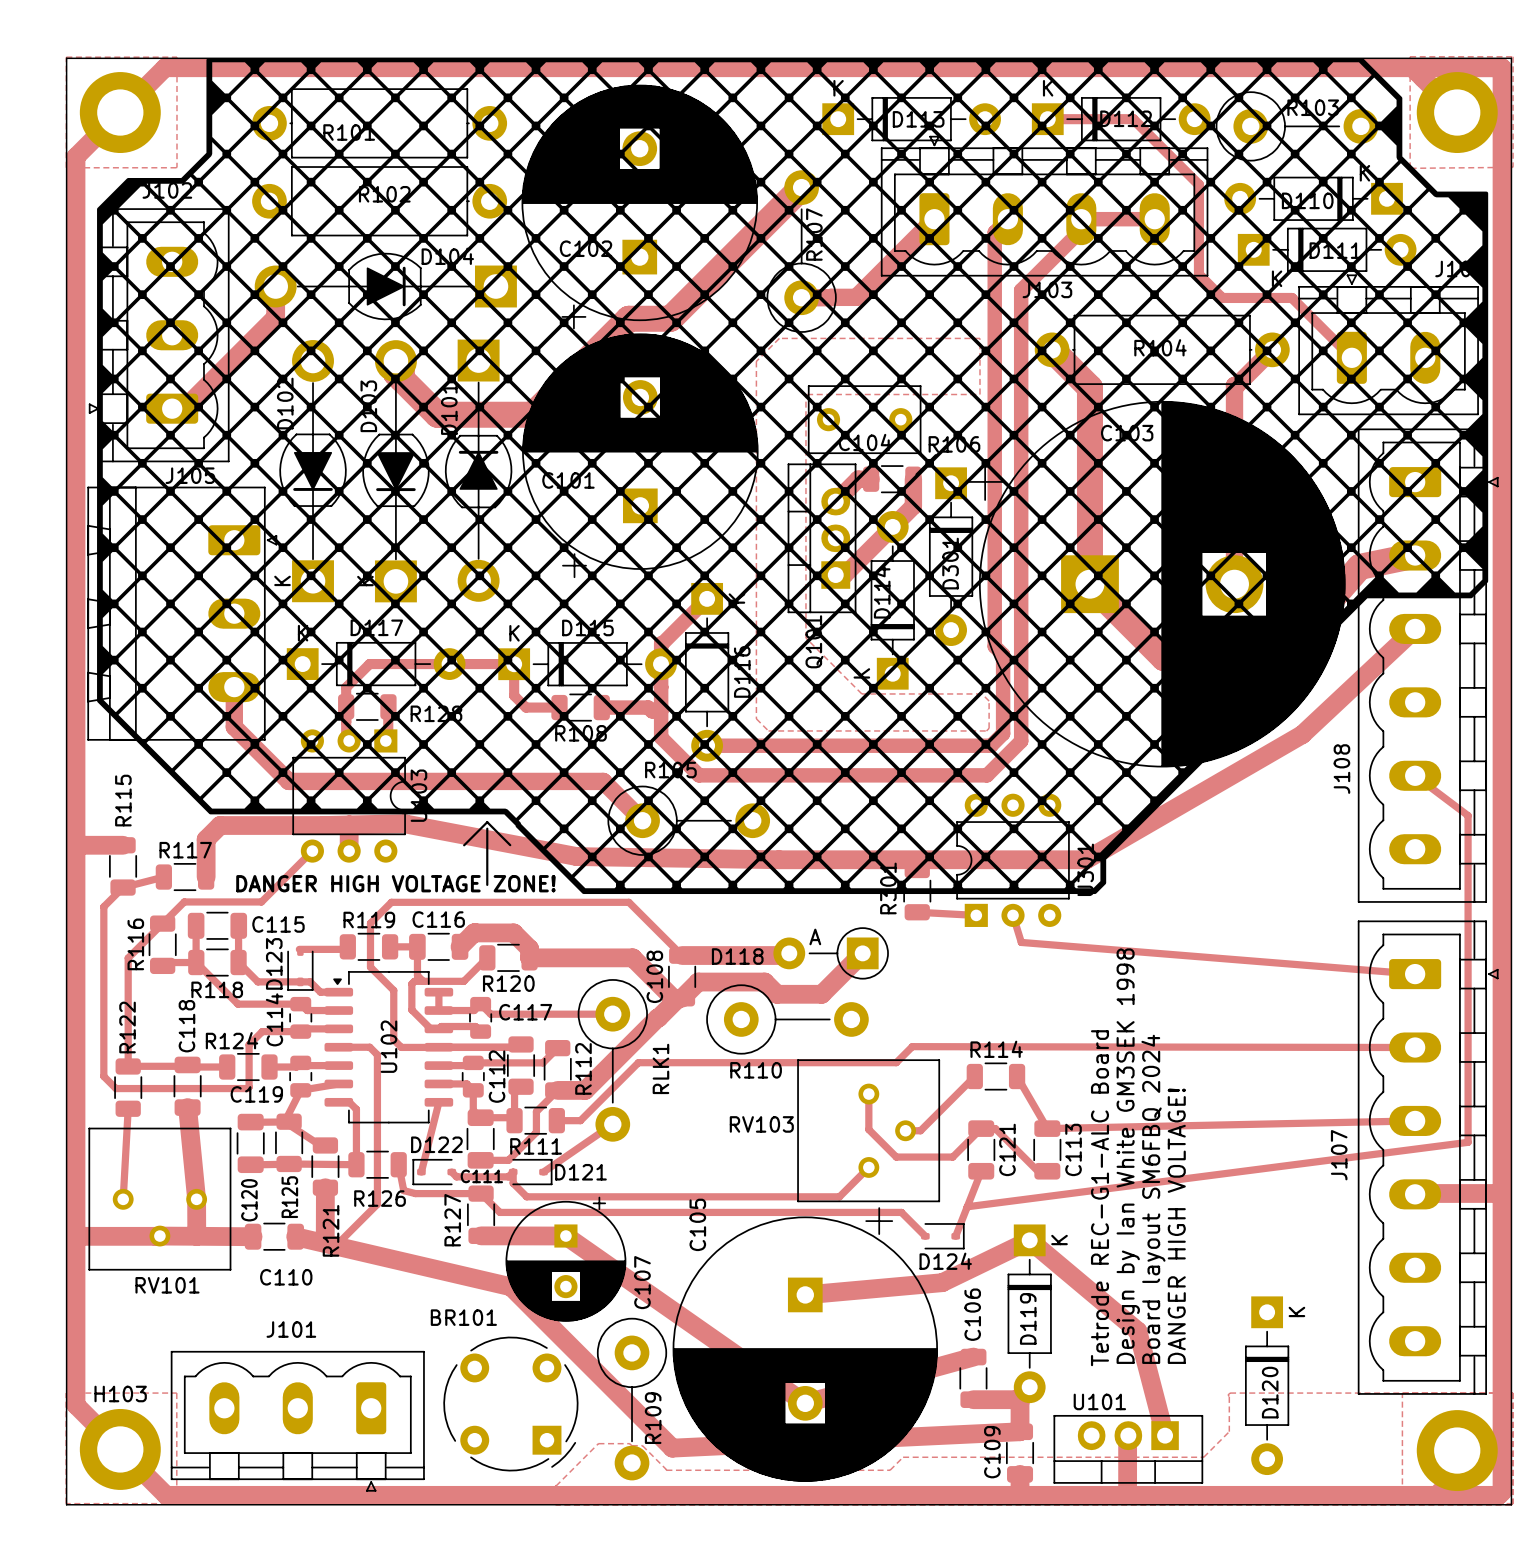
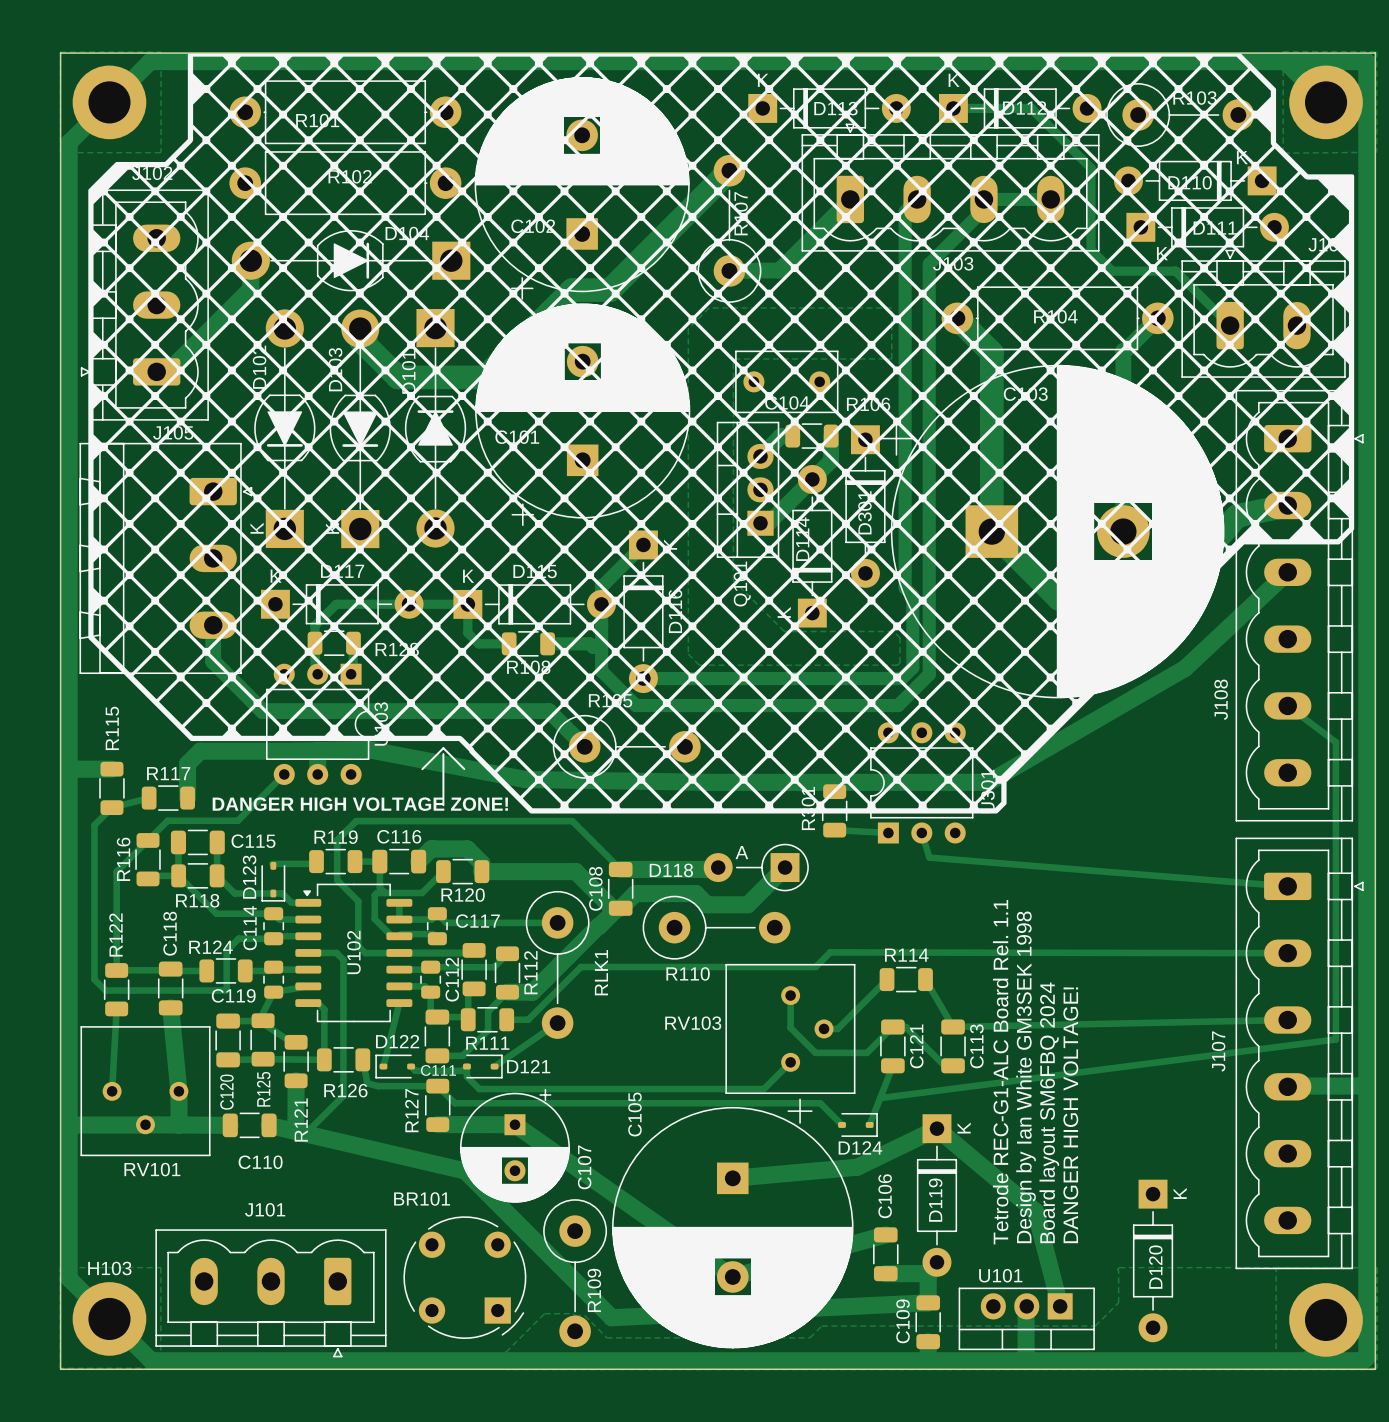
text: Tetrode REC-G1-ALC Board (1099, 1198) -> Tetrode REC-G1-ALC Board Rel. 1.1 (1000, 1072)

